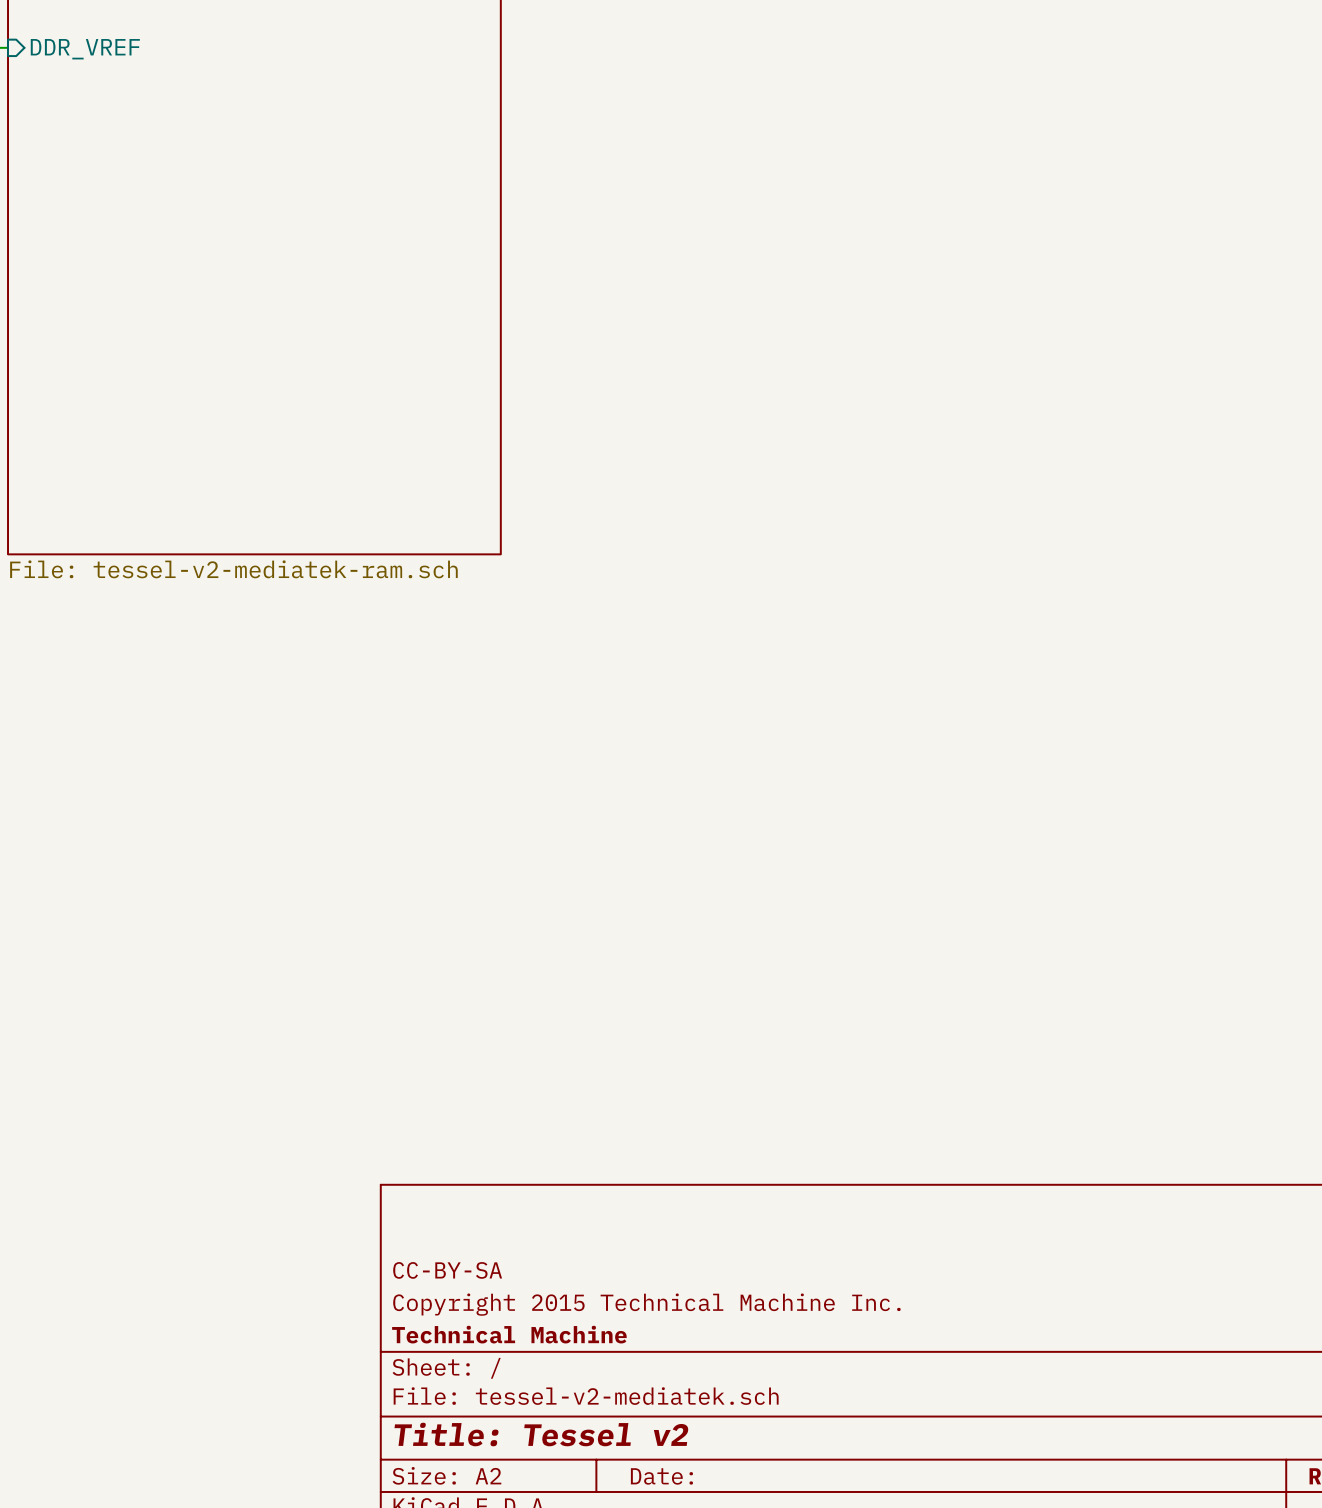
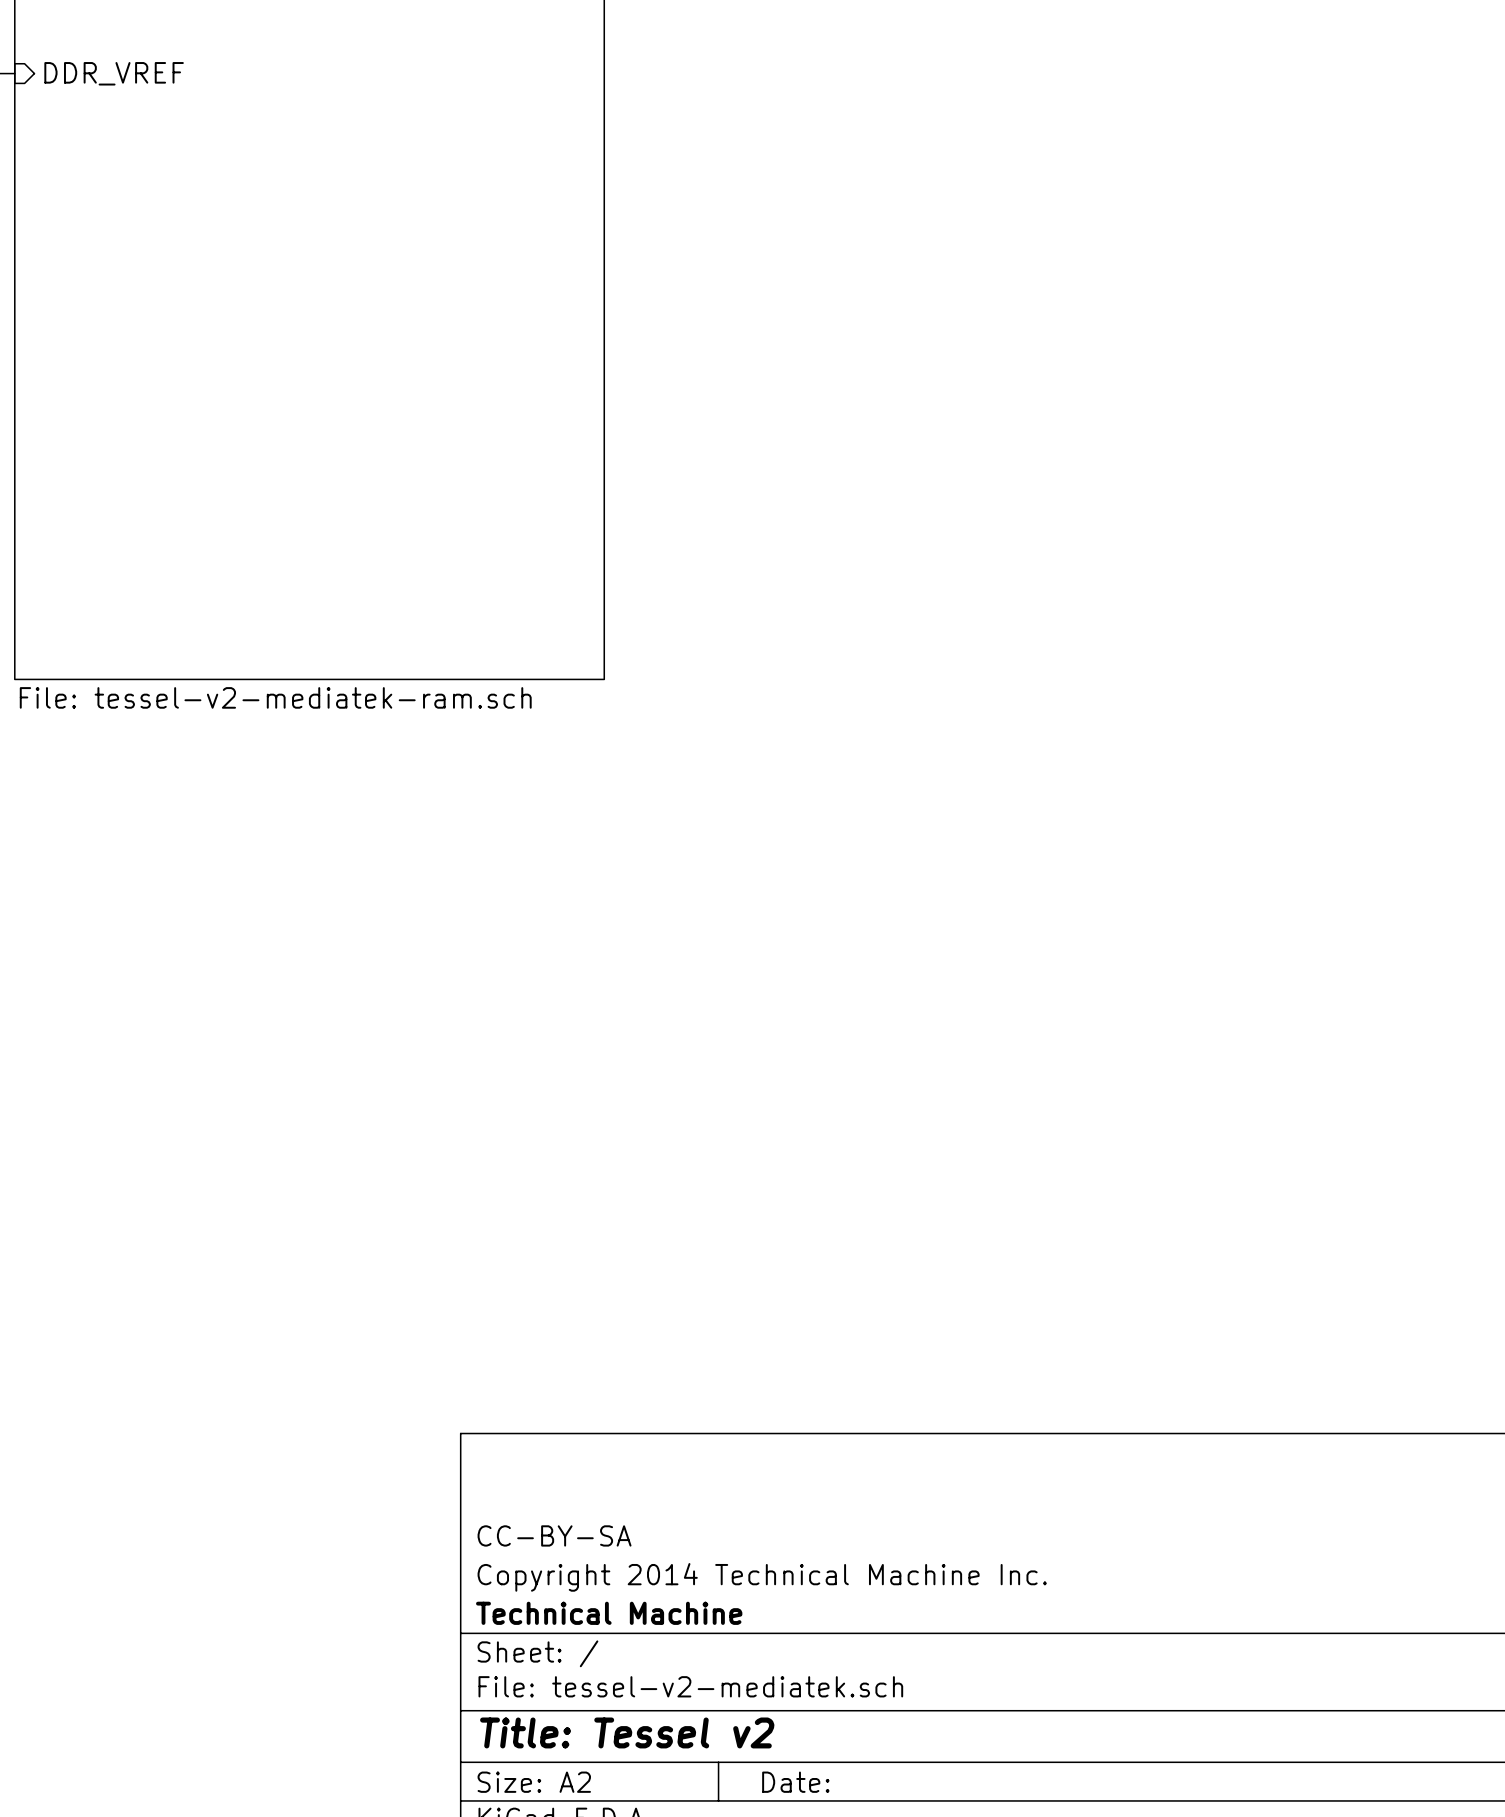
title block: Copyright 2015 Technical Machine Inc. (646, 1304) -> Copyright 2014 Technical Machine Inc. (762, 1577)

